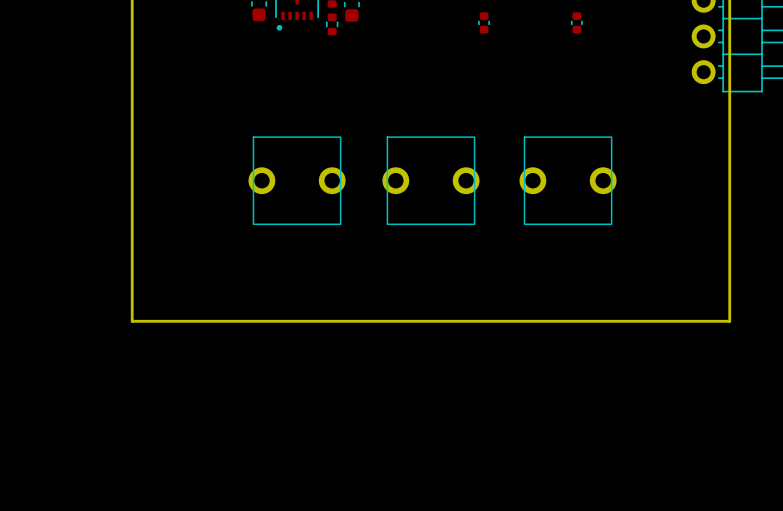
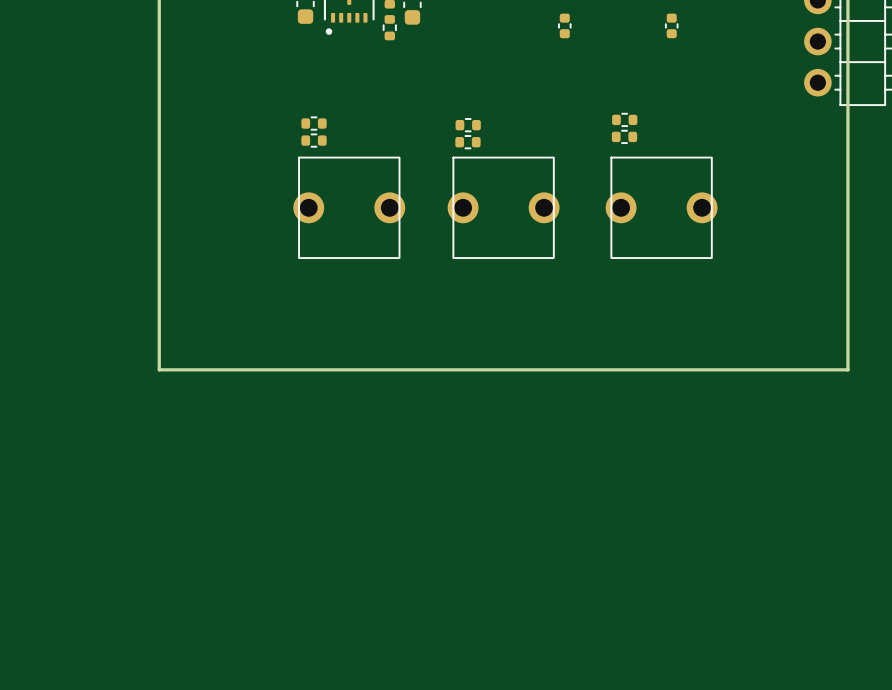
part: none -> (624, 119)
part: none -> (314, 123)
part: none -> (468, 125)
part: none -> (624, 136)
part: none -> (314, 140)
part: none -> (467, 142)

